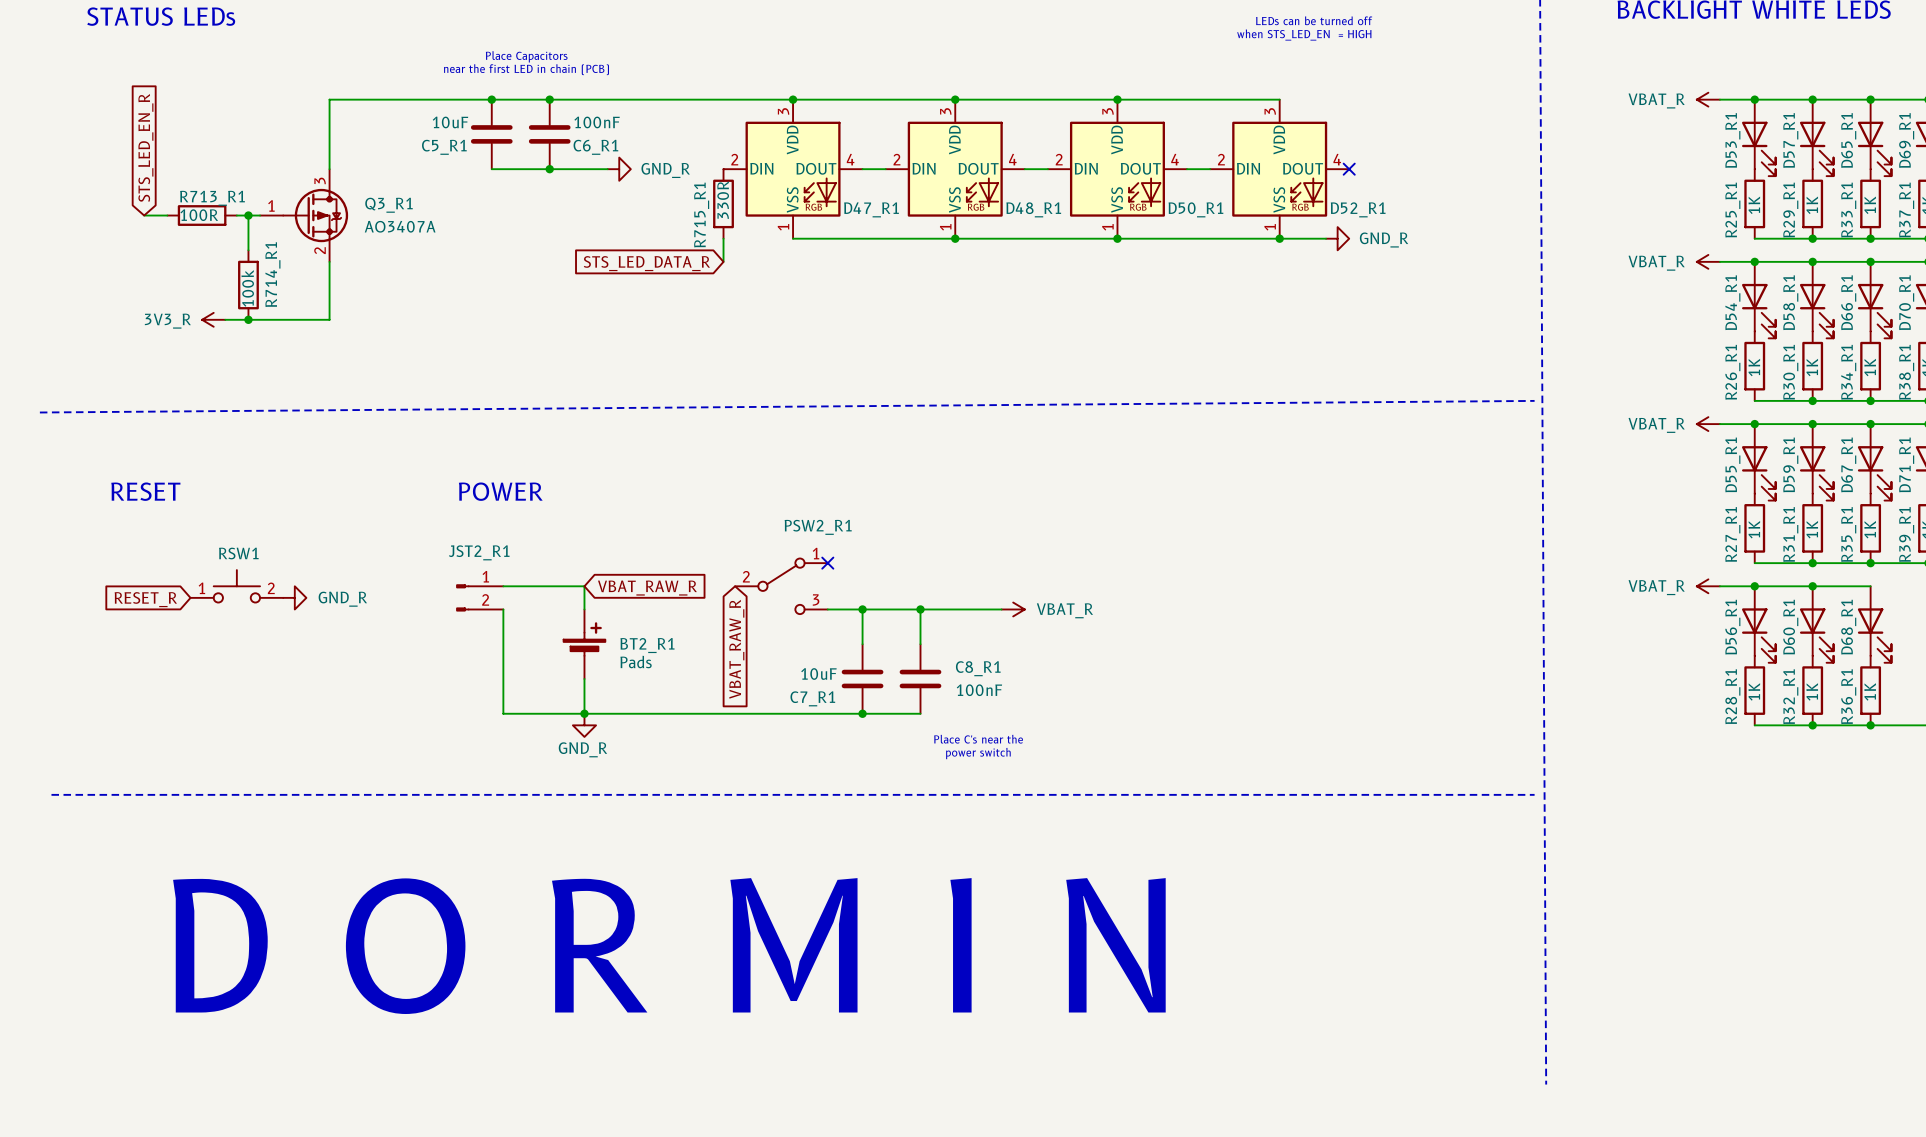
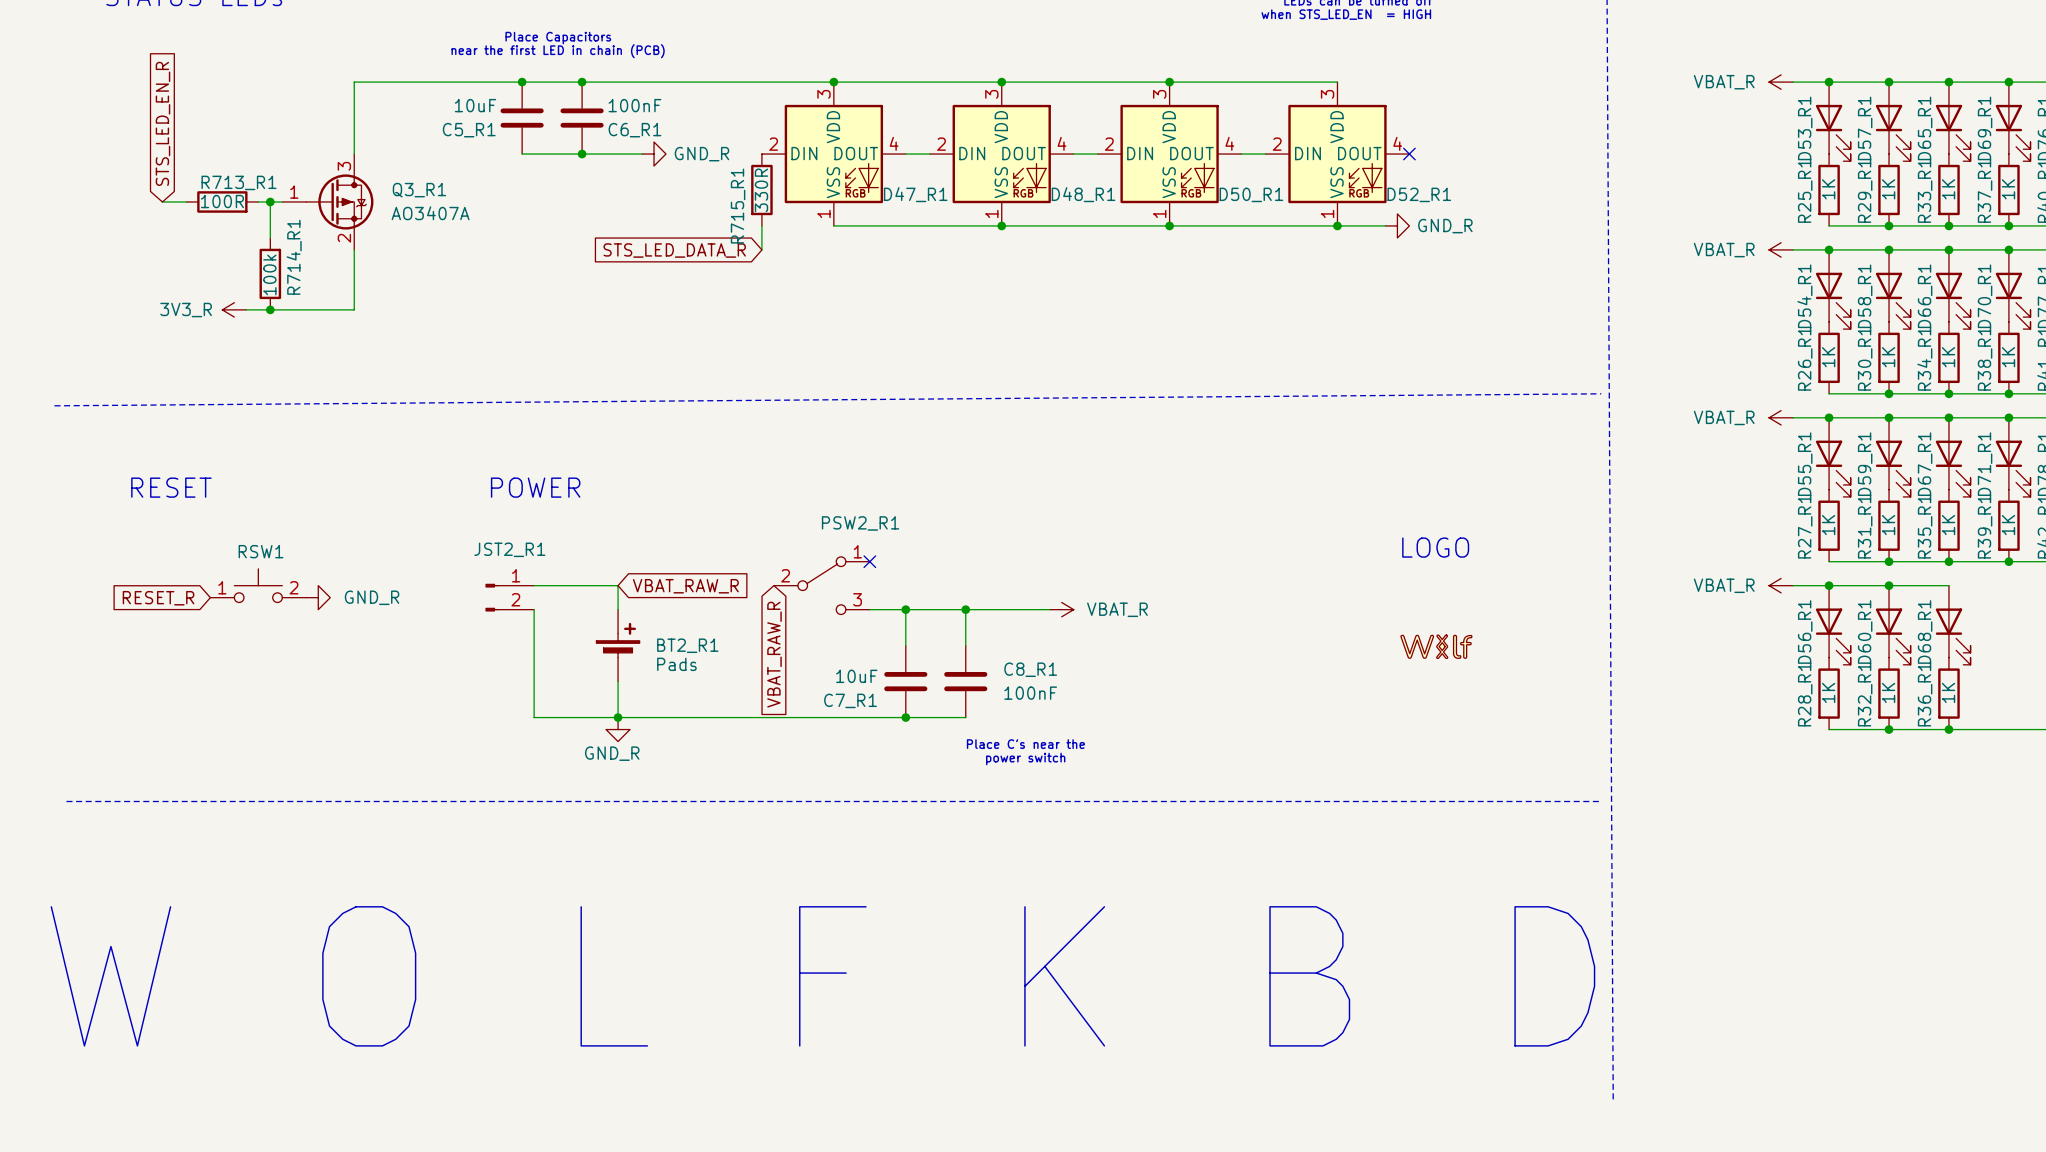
text: none -> LOGO (1435, 547)
part: none -> (1436, 646)
text: D O R M I N (669, 946) -> none
text: none -> W O L F K B D (822, 976)

